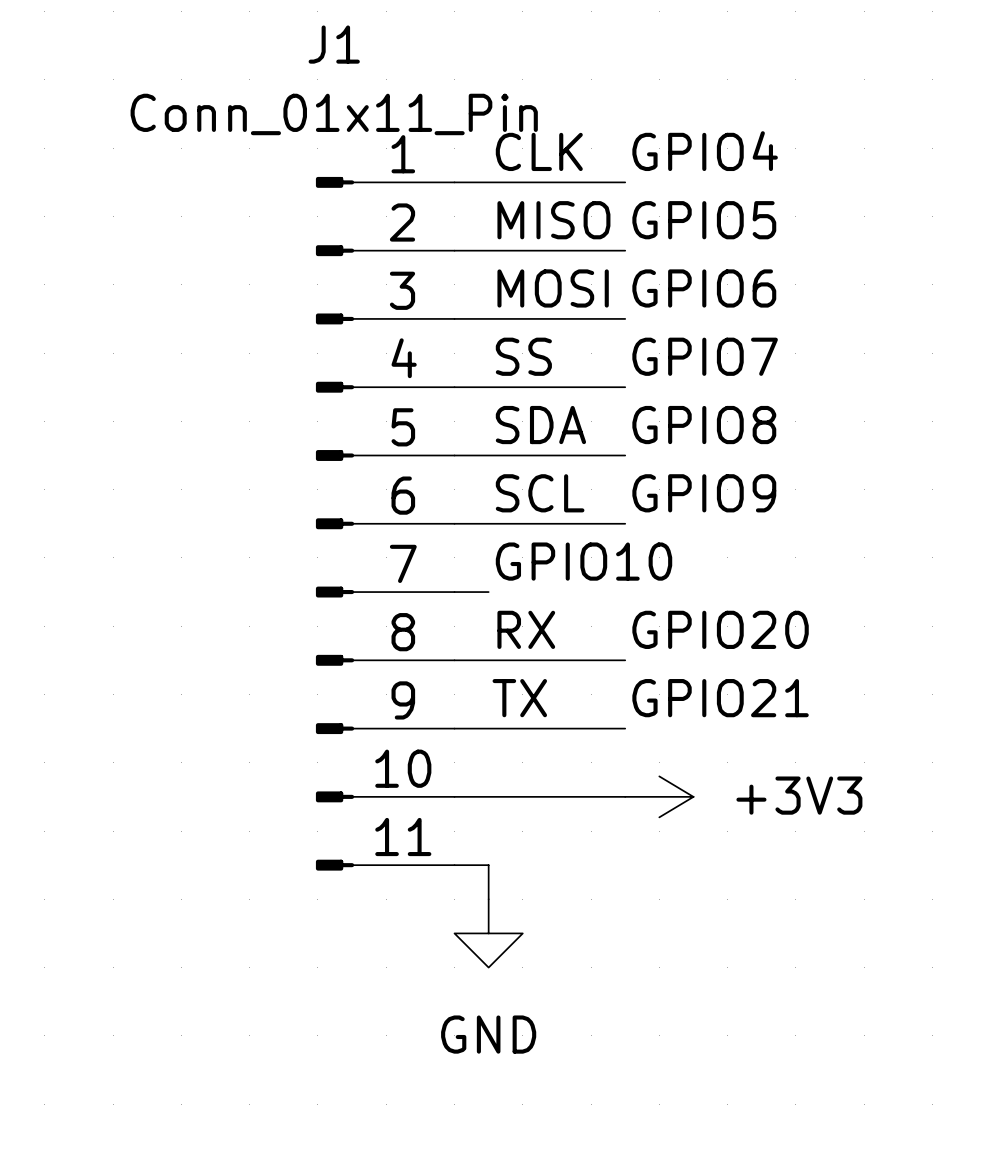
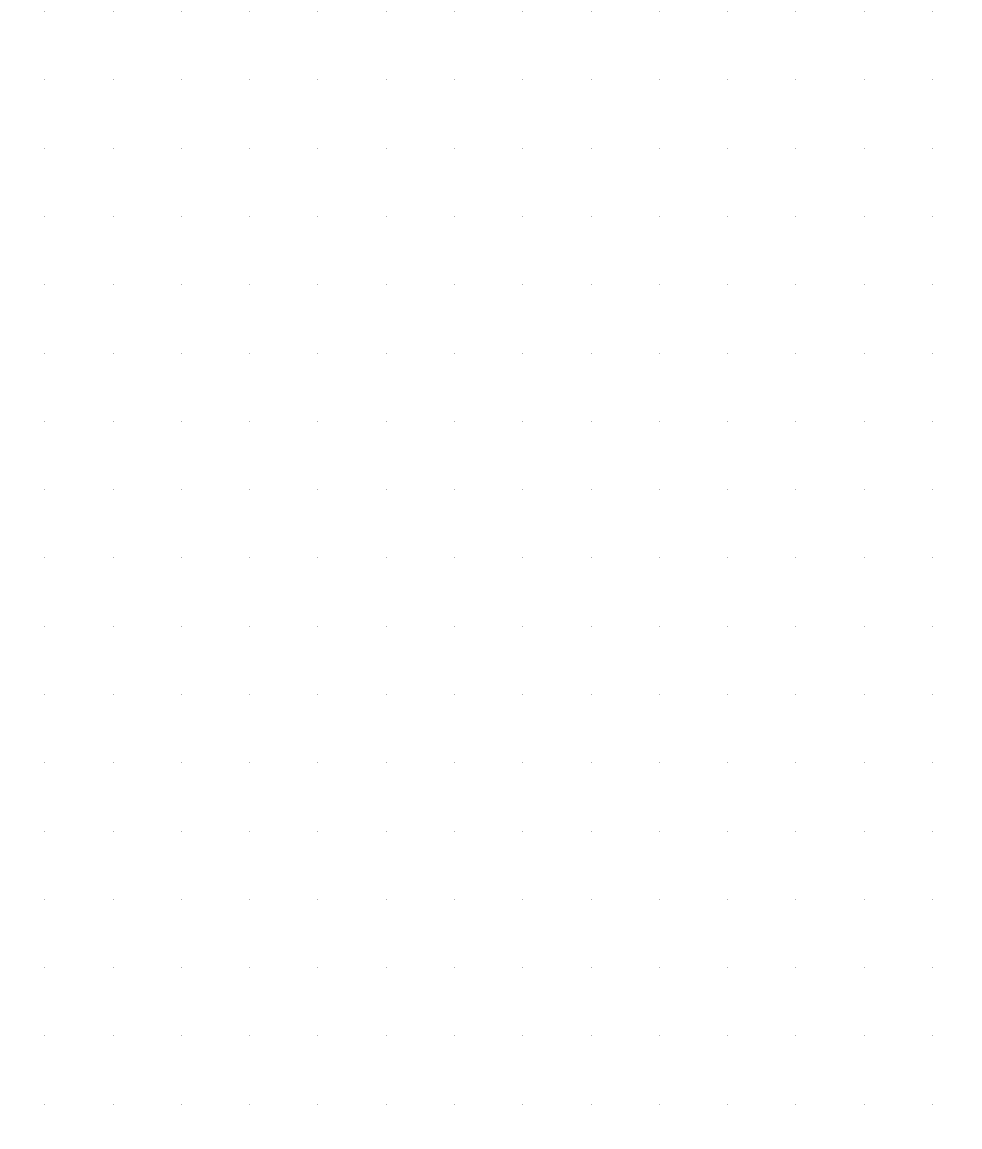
label: CLK (539, 151) -> none
label: GPIO4 (705, 151) -> none
wire: (454, 182) (625, 182) -> none
label: MISO (553, 220) -> none
label: GPIO5 (704, 220) -> none
wire: (454, 250) (625, 250) -> none
label: MOSI (553, 288) -> none
label: GPIO6 (704, 288) -> none
wire: (454, 318) (625, 318) -> none
label: SS (523, 356) -> none
label: GPIO7 (705, 356) -> none
wire: (454, 387) (625, 387) -> none
label: SDA (540, 425) -> none
label: GPIO8 (704, 425) -> none
wire: (454, 455) (625, 455) -> none
label: SCL (540, 493) -> none
label: GPIO9 (704, 493) -> none
J1: Conn_01x11_Pin (385, 523) -> none
wire: (454, 523) (625, 523) -> none
label: GPIO10 (584, 561) -> none
wire: (454, 592) (488, 592) -> none
label: RX (526, 629) -> none
label: GPIO20 (720, 629) -> none
wire: (454, 660) (625, 660) -> none
label: TX (519, 698) -> none
label: GPIO21 (720, 698) -> none
wire: (454, 728) (625, 728) -> none
wire: (454, 796) (625, 796) -> none
power symbol: +3V3 (659, 796) -> none
wire: (454, 865) (488, 865) (488, 899) -> none
power symbol: GND (488, 933) -> none

